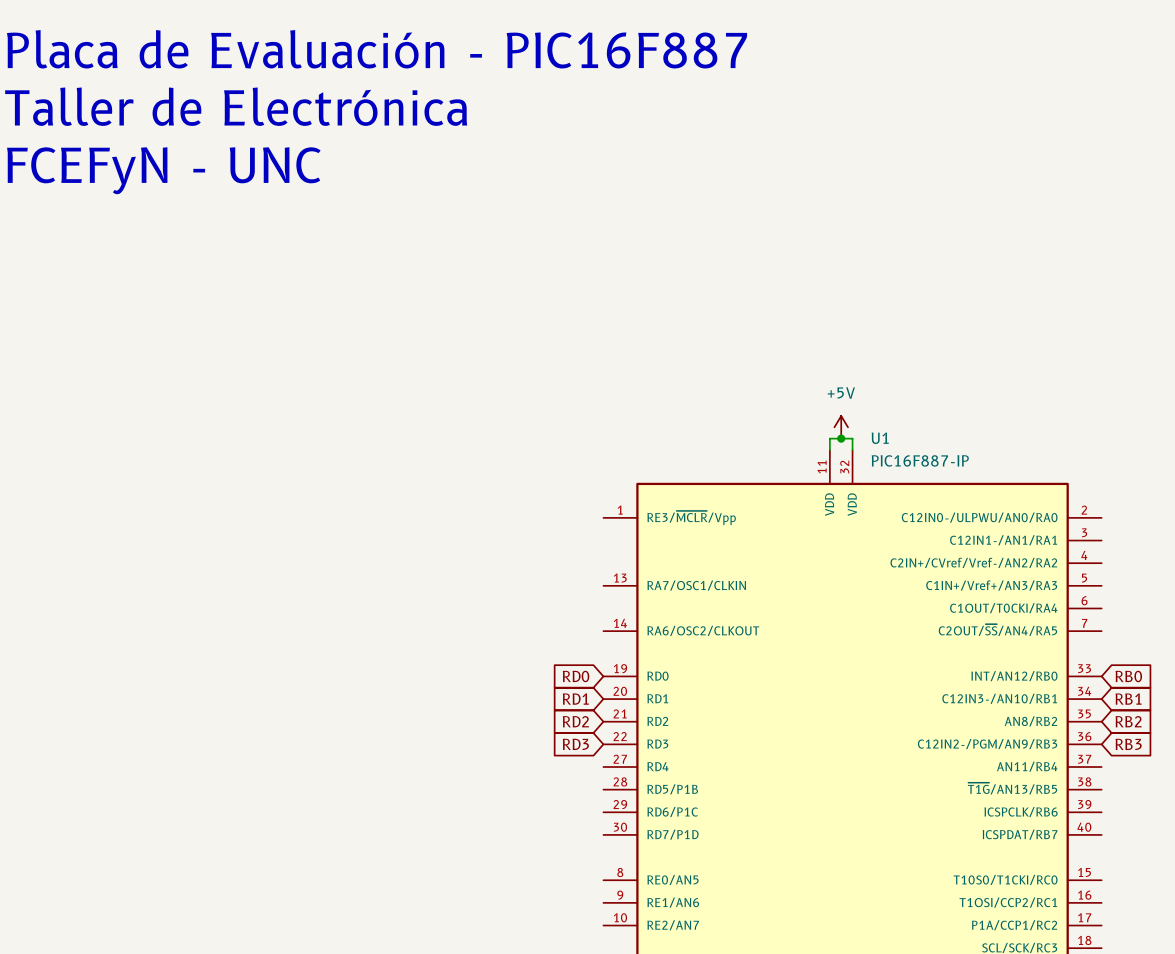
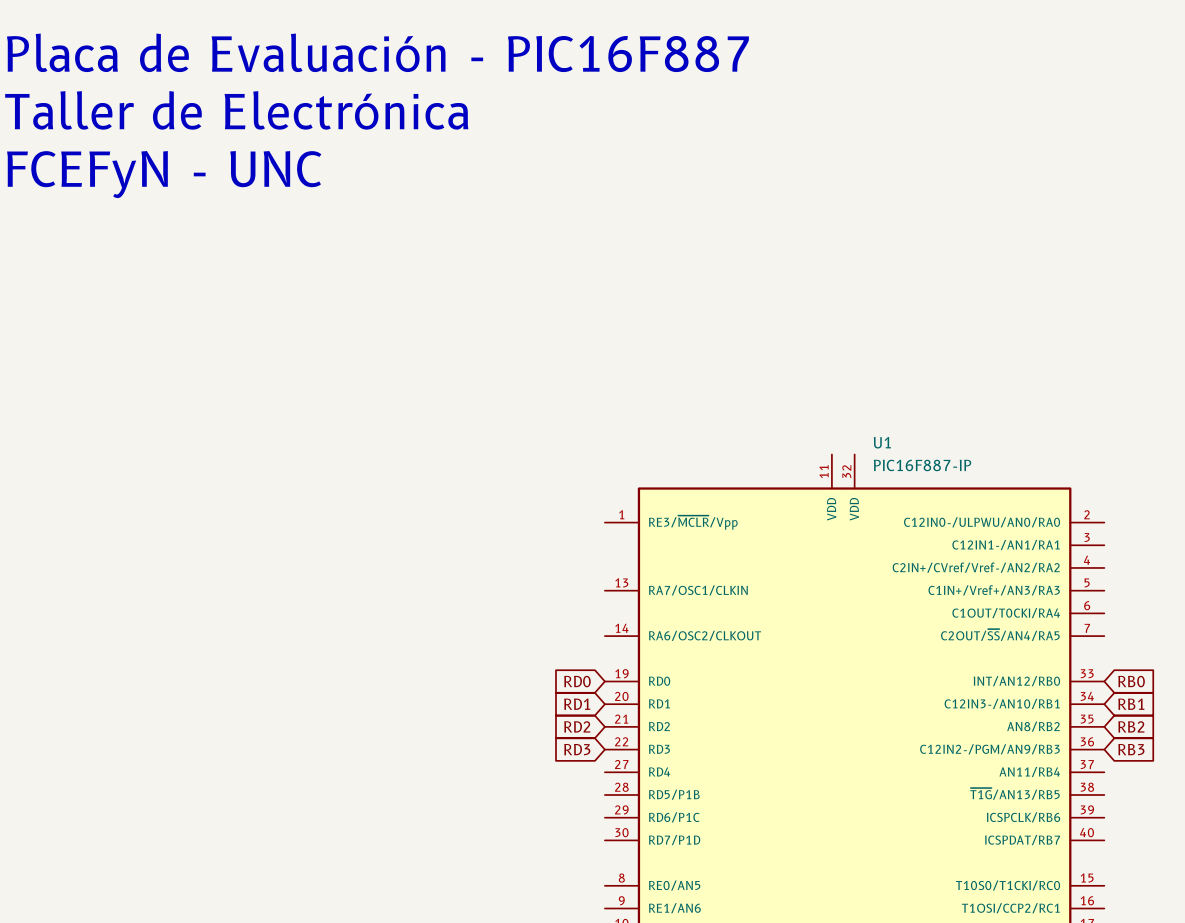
power symbol: +5V (841, 427) -> none
junction: (841, 438) -> none
wire: (829, 449) (829, 438) (852, 438) (852, 449) -> none

